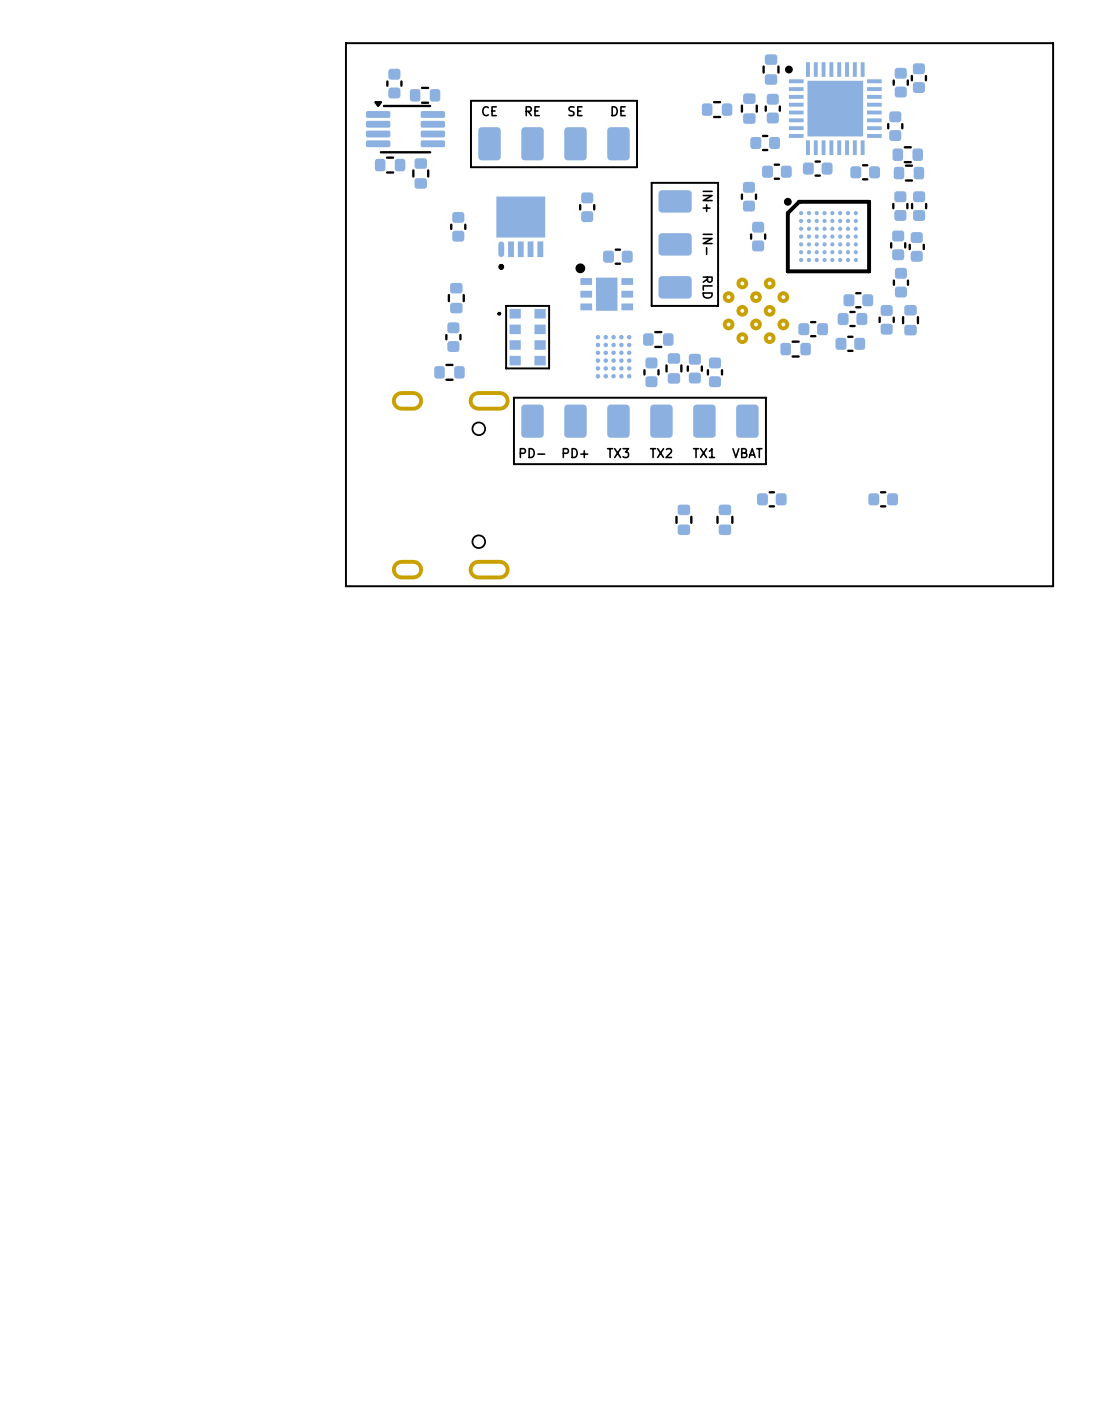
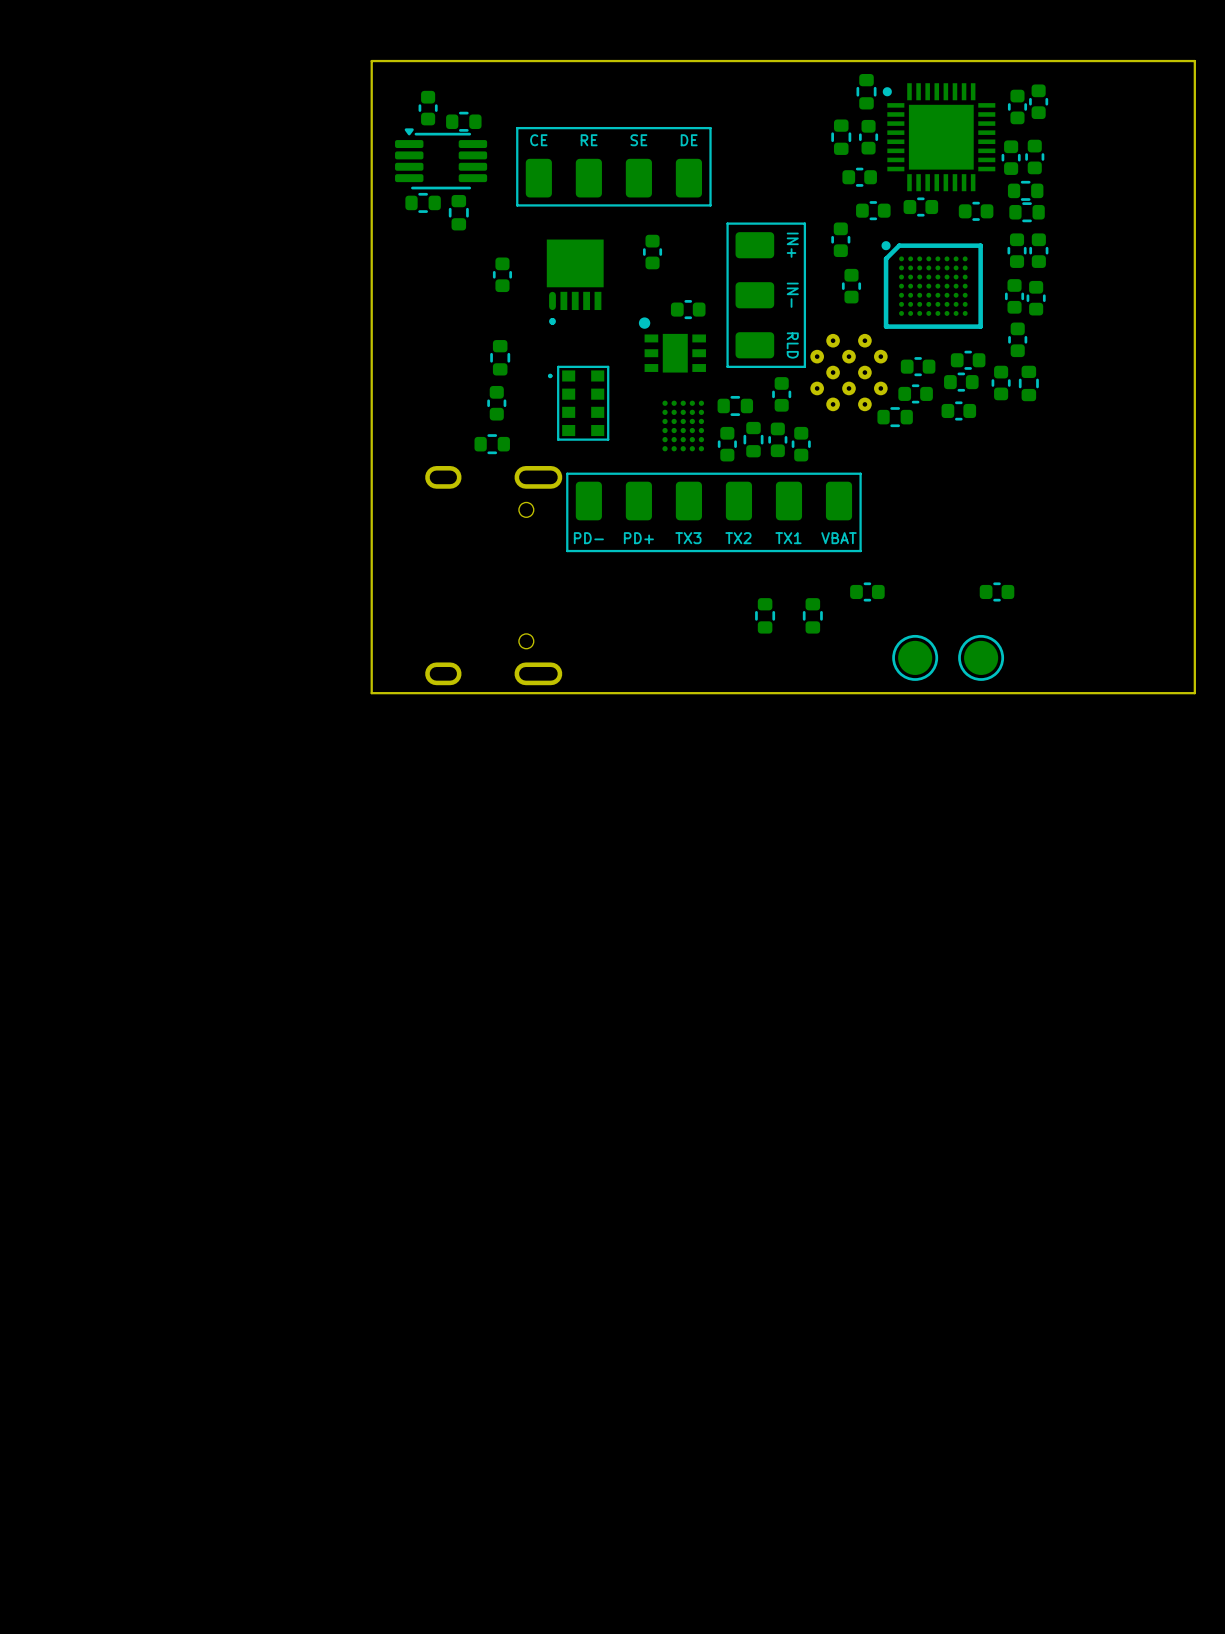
part: (717, 109) -> none
part: none -> (1034, 156)
part: none -> (918, 366)
part: none -> (781, 394)
part: none -> (915, 657)
part: none -> (981, 657)

